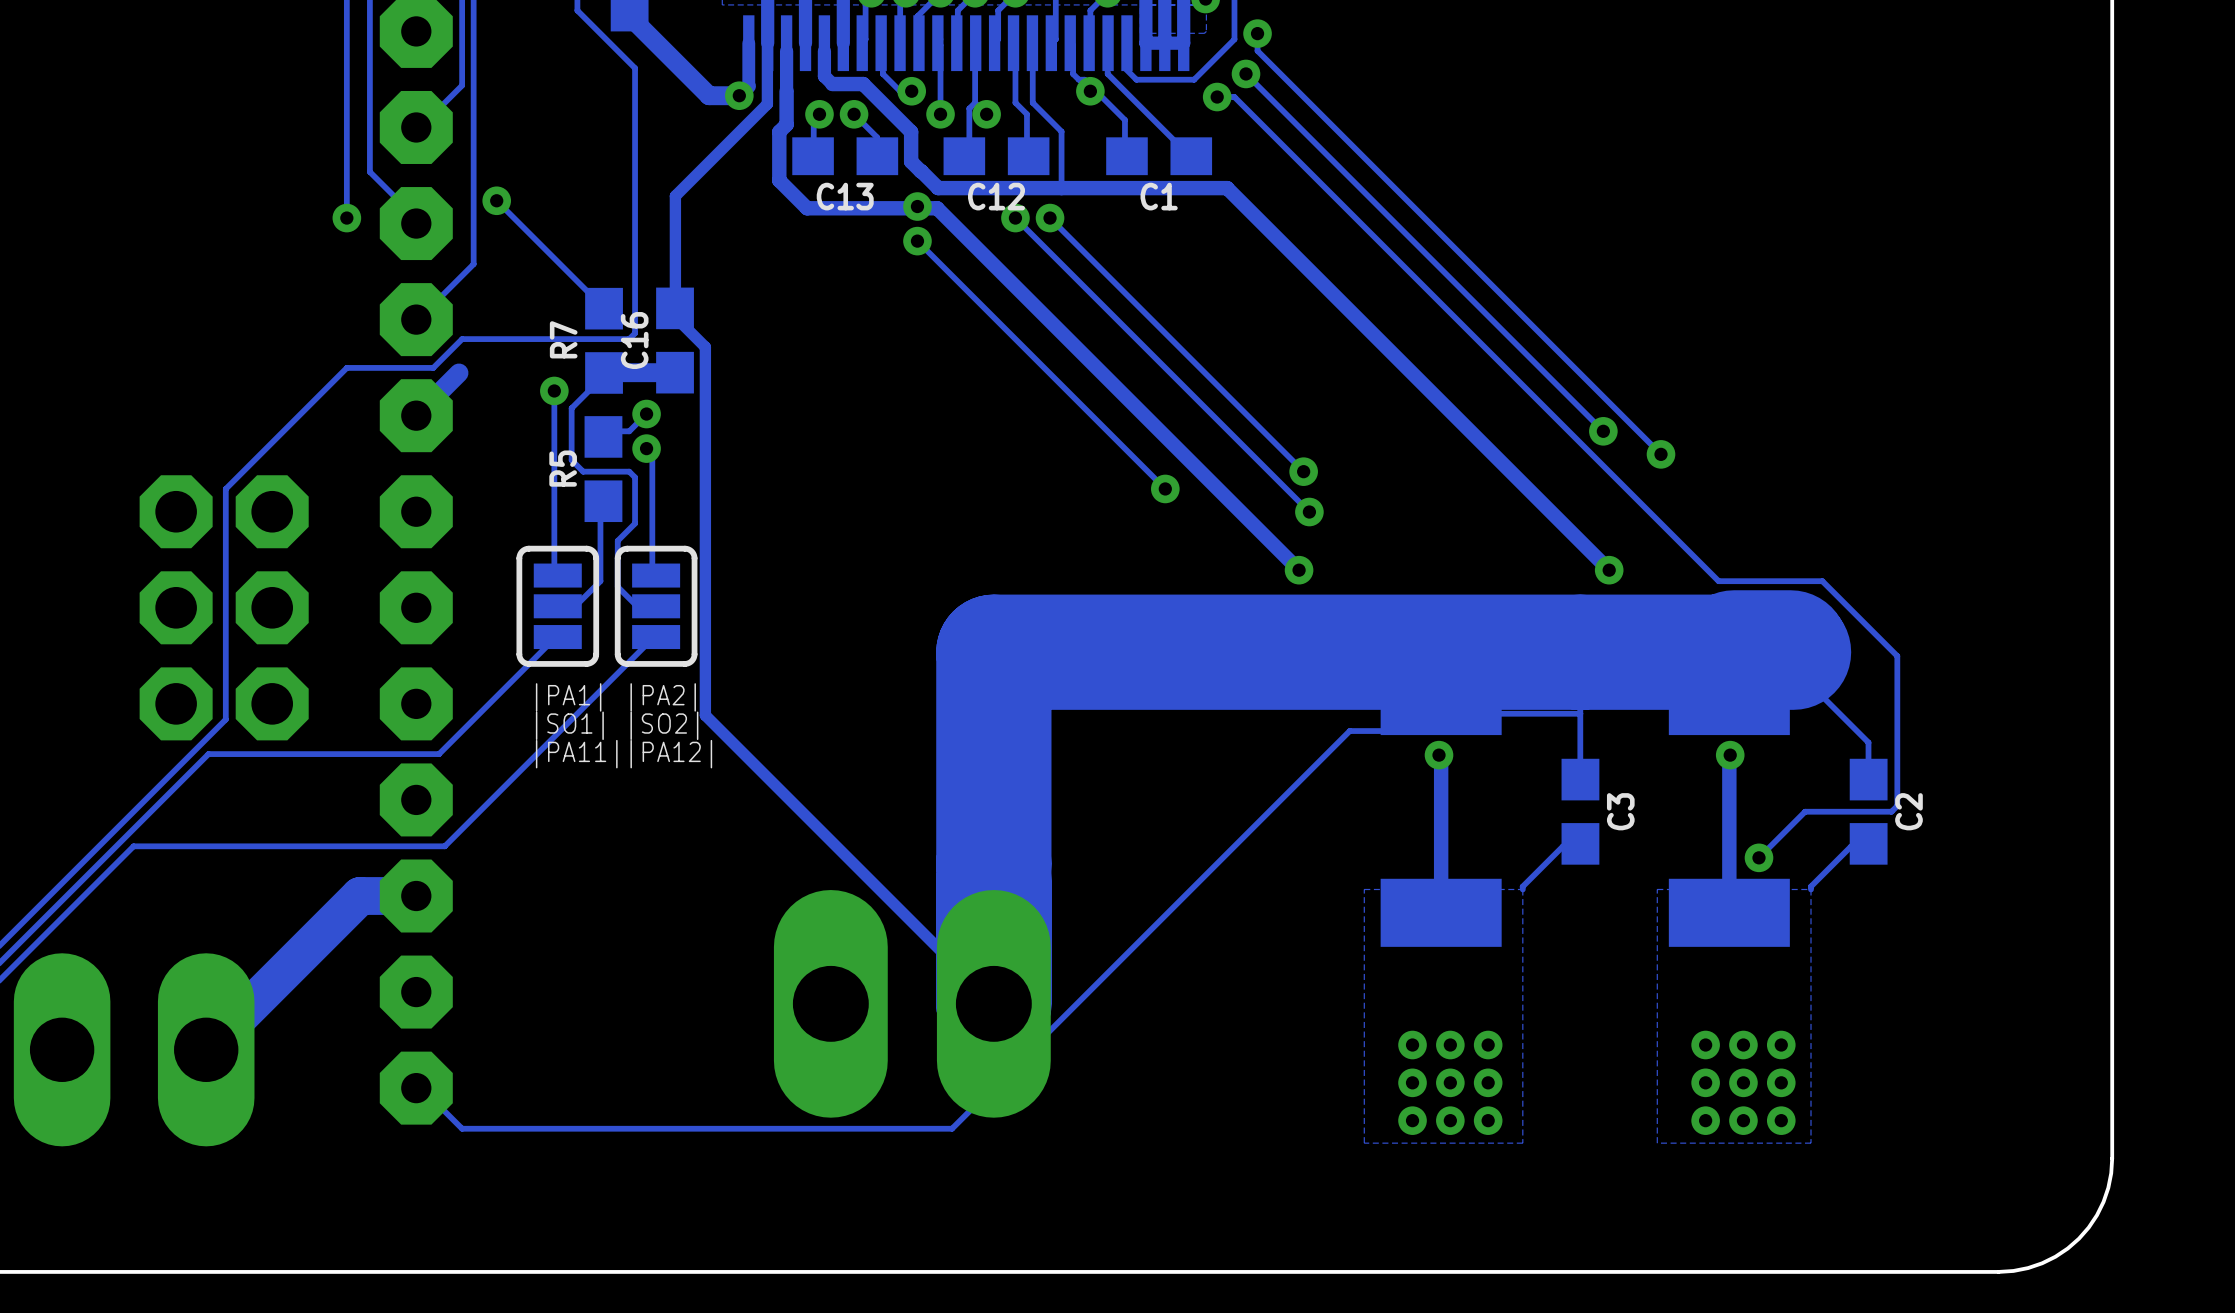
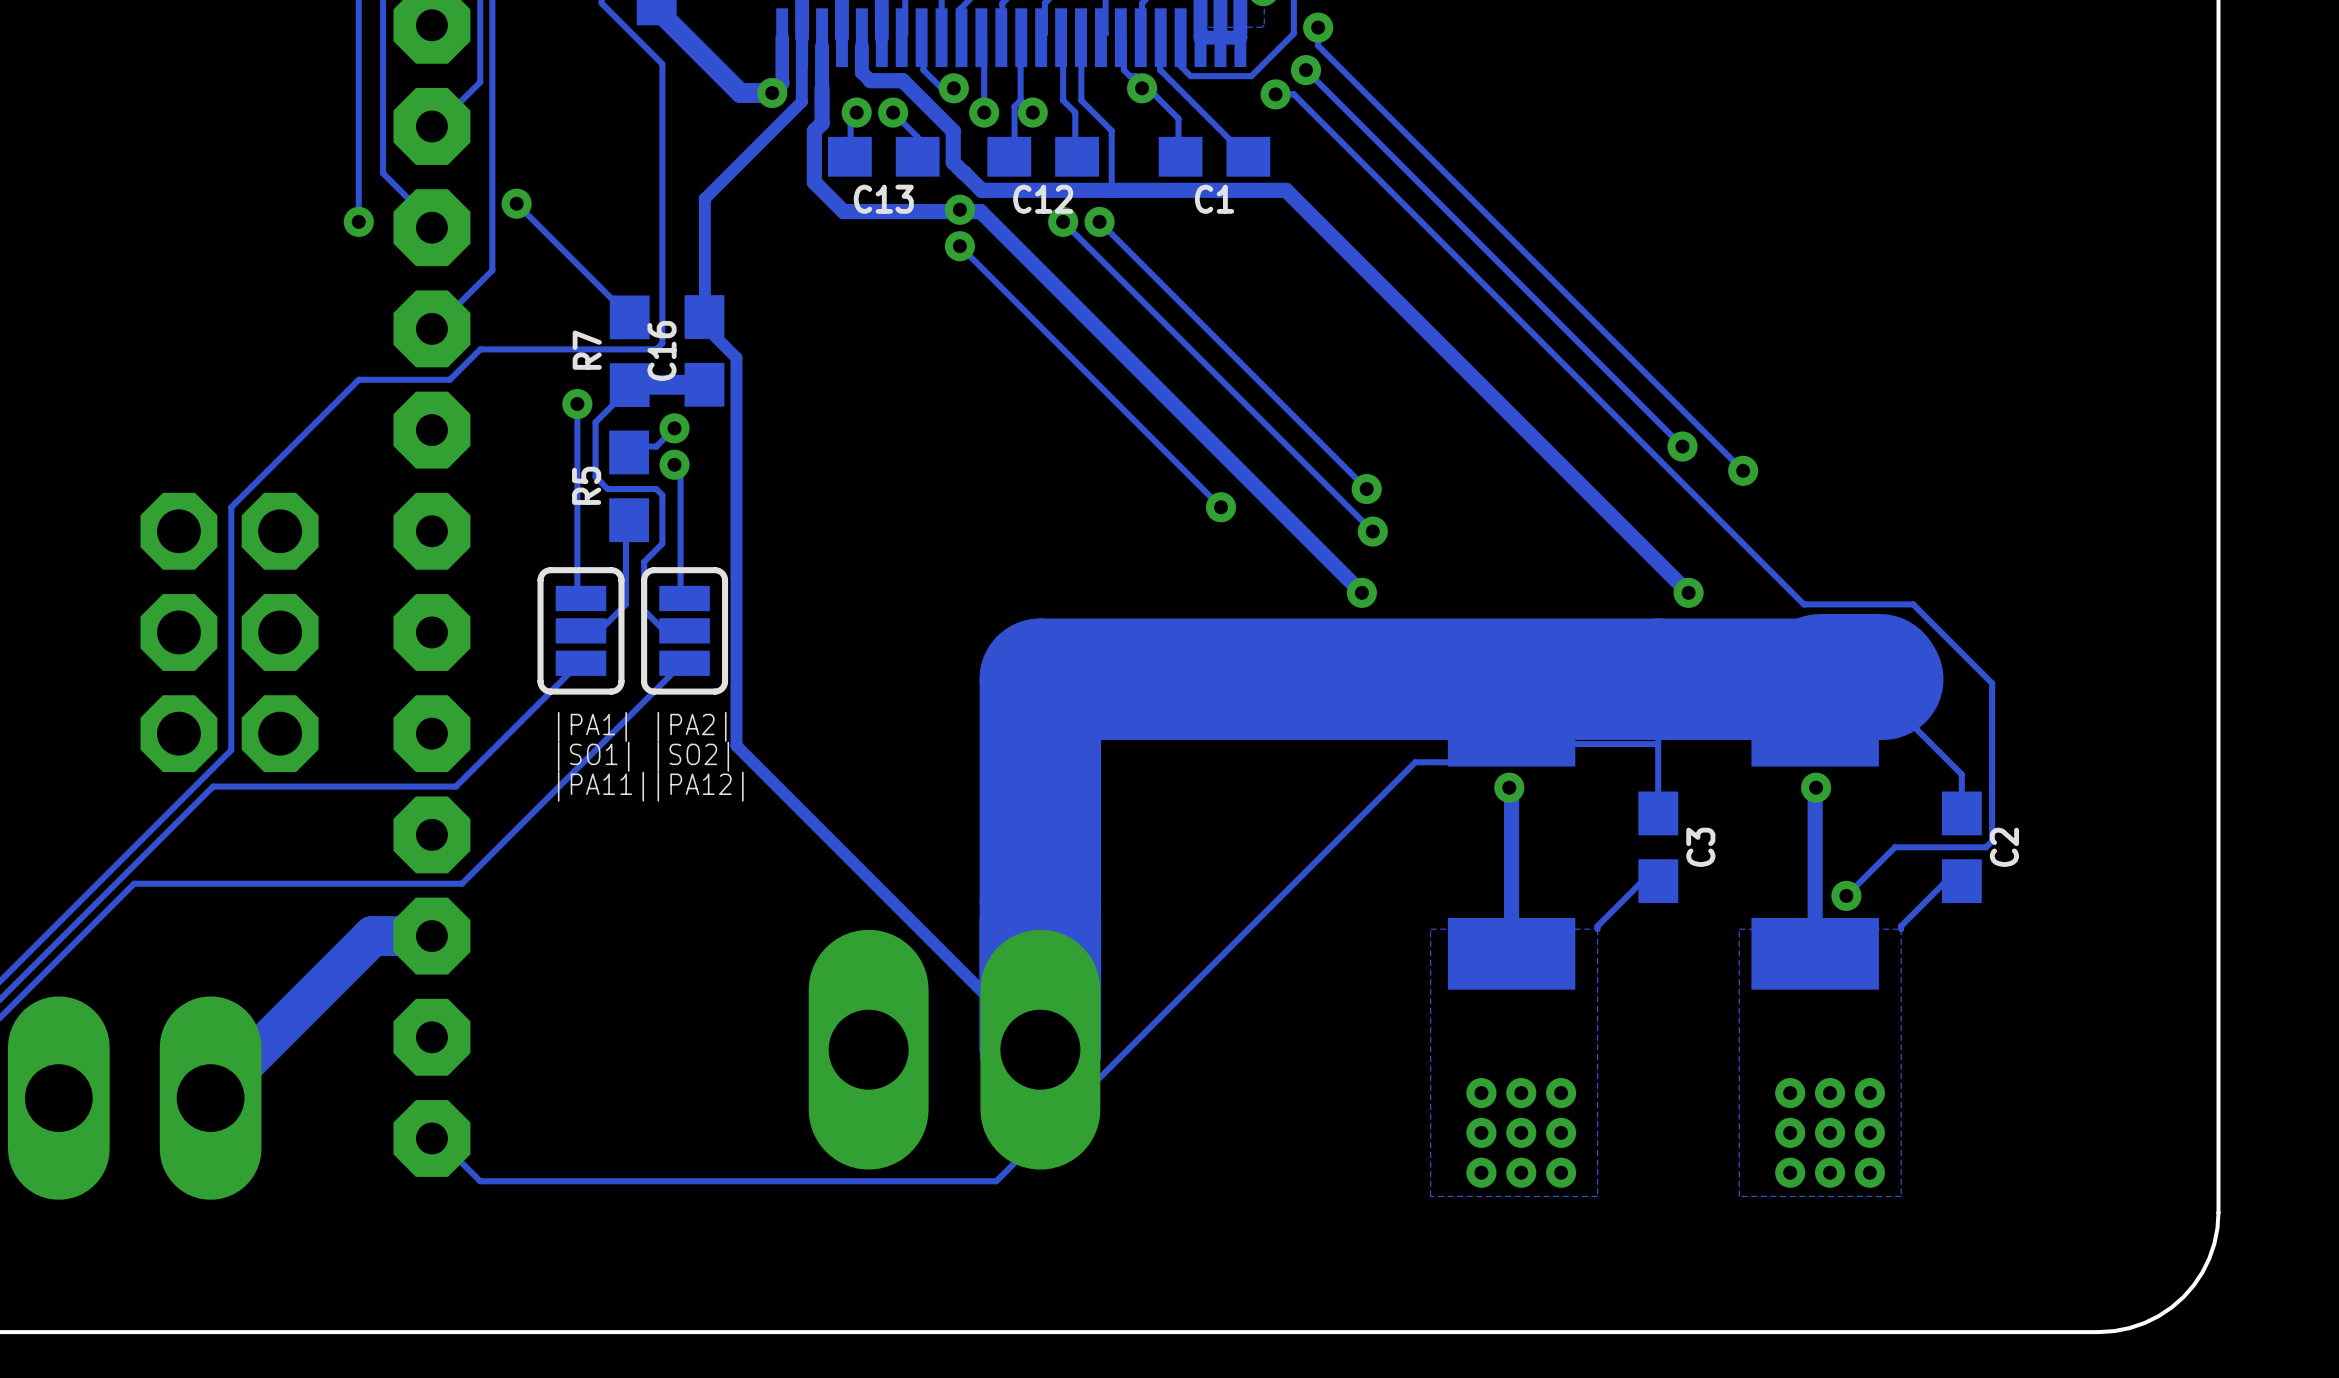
track: (458, 372) (416, 415) -> none

